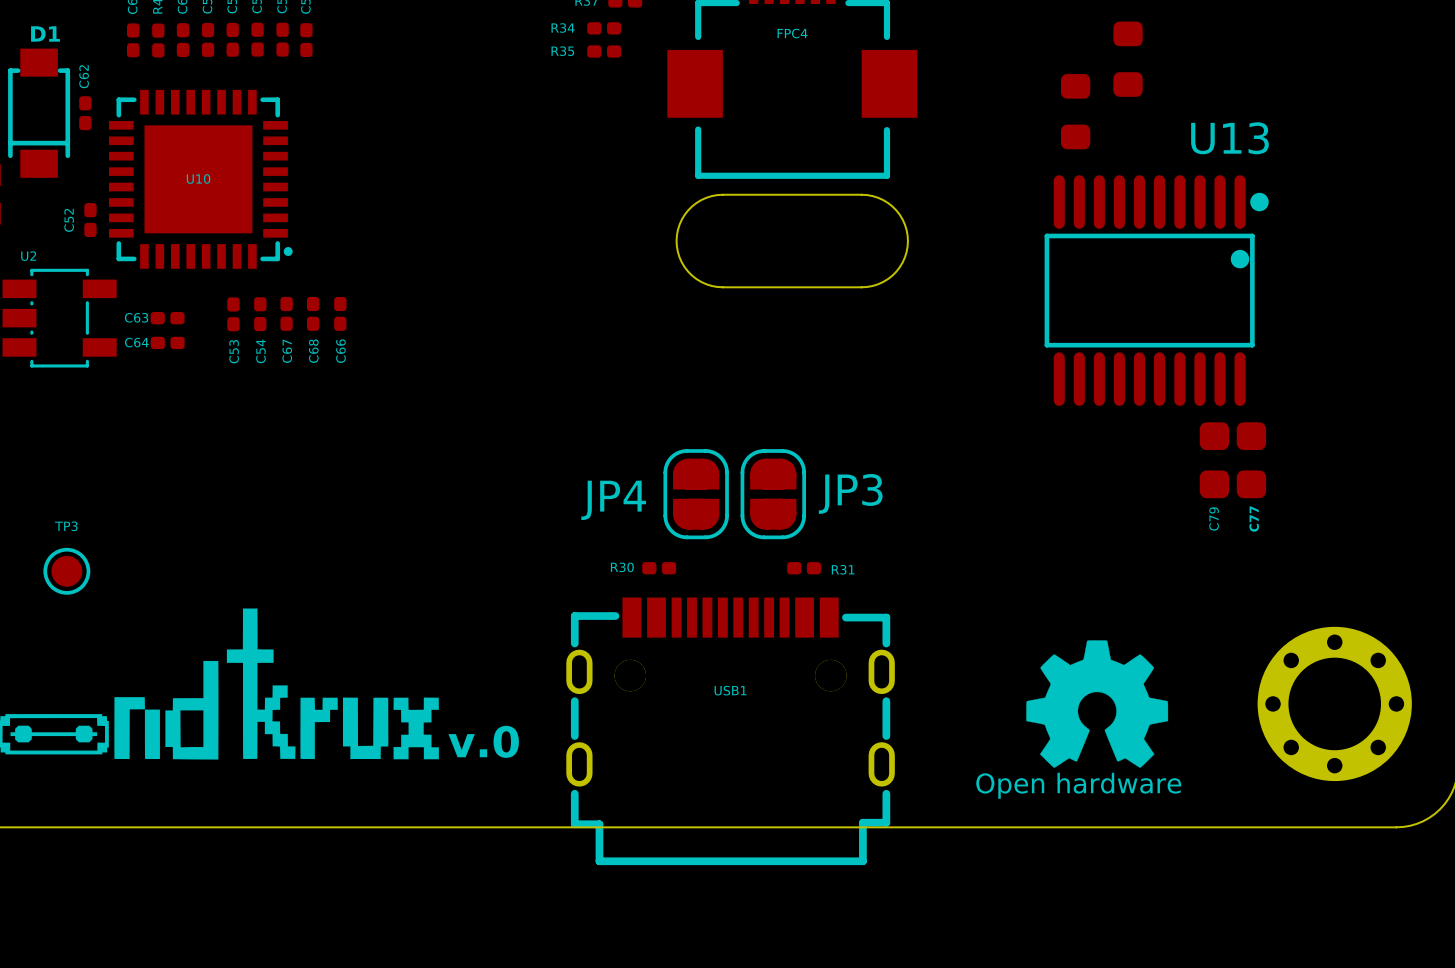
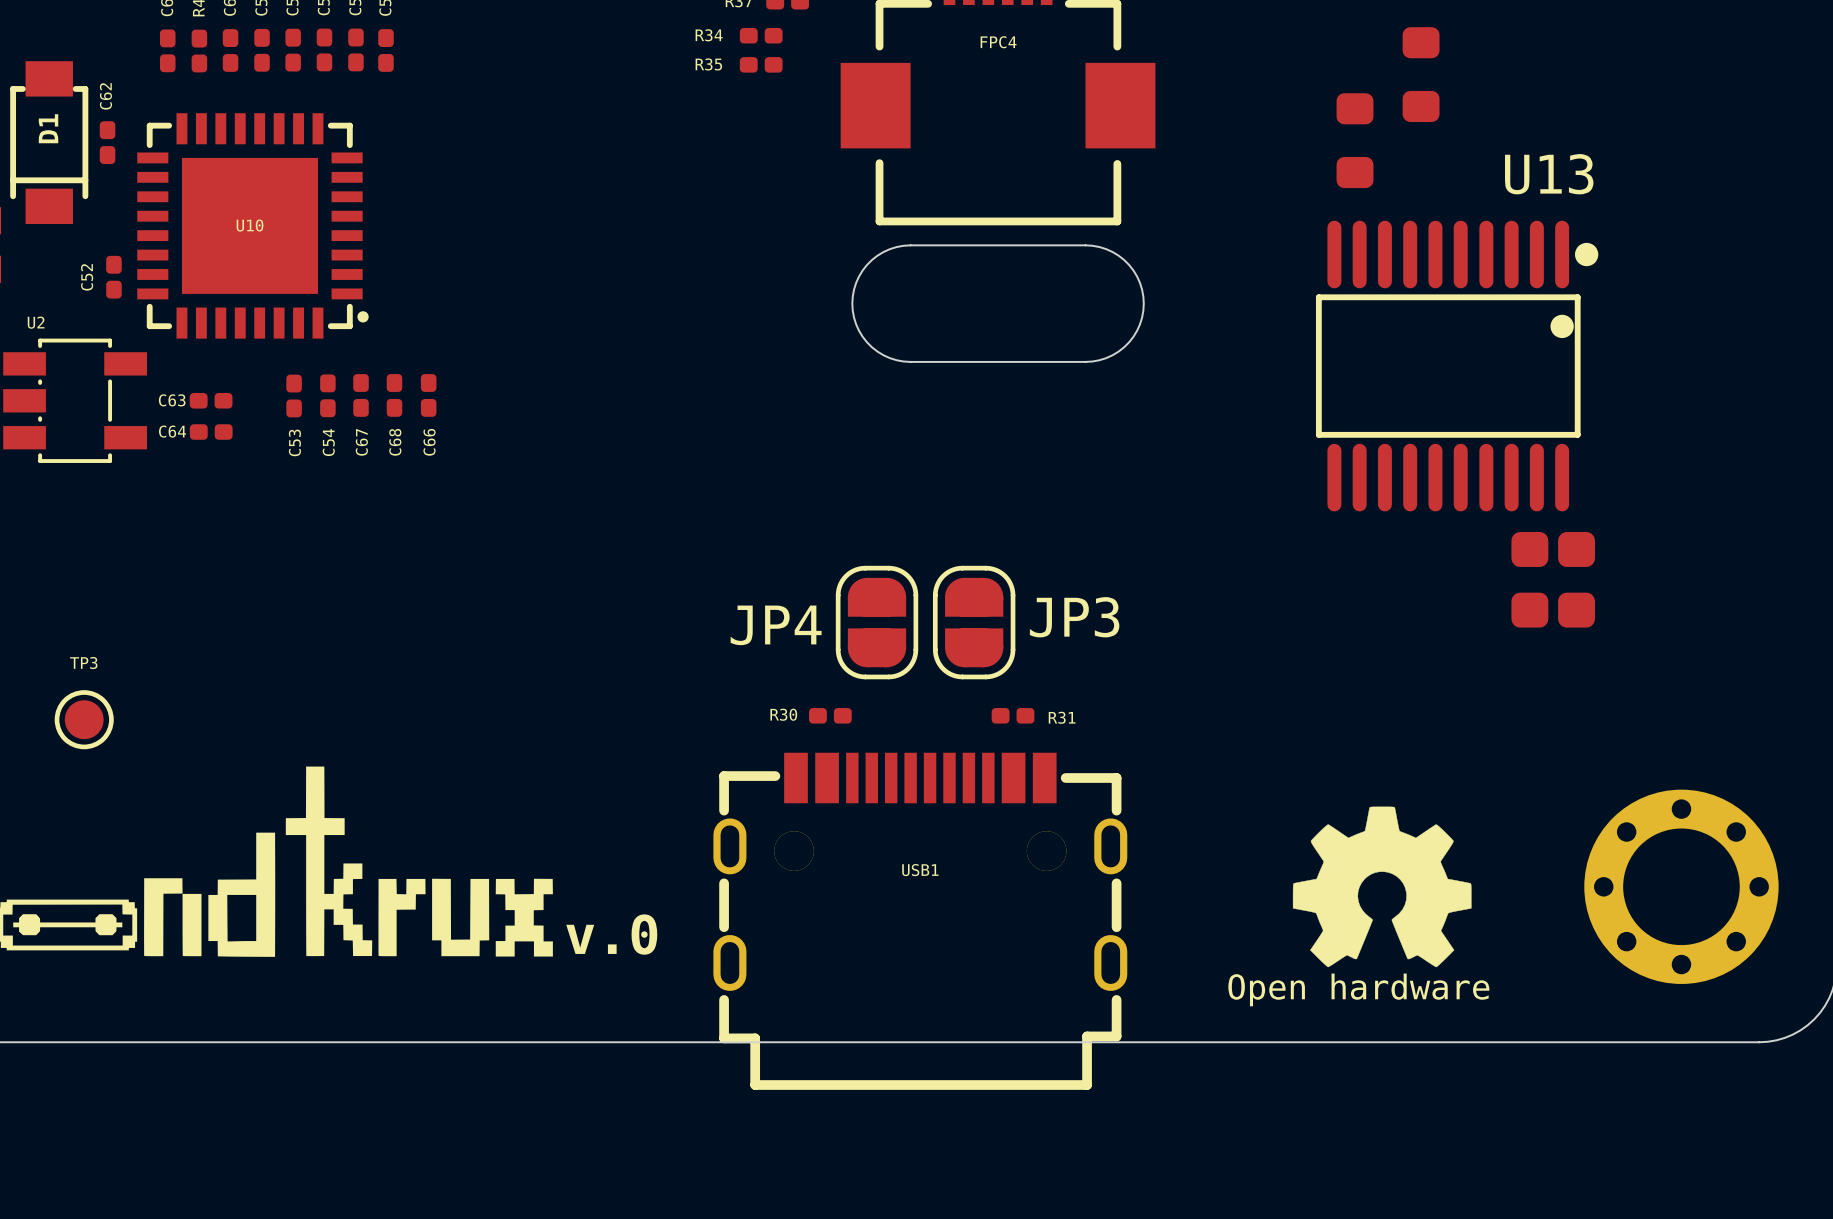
D1 name rotation: 0° (45, 33) -> 90° counterclockwise (48, 128)
D1 name position: D1 (45, 33) -> D1 (48, 128)
C79 name: C79 (1214, 518) -> none
C77 name: C77 (1254, 519) -> none

